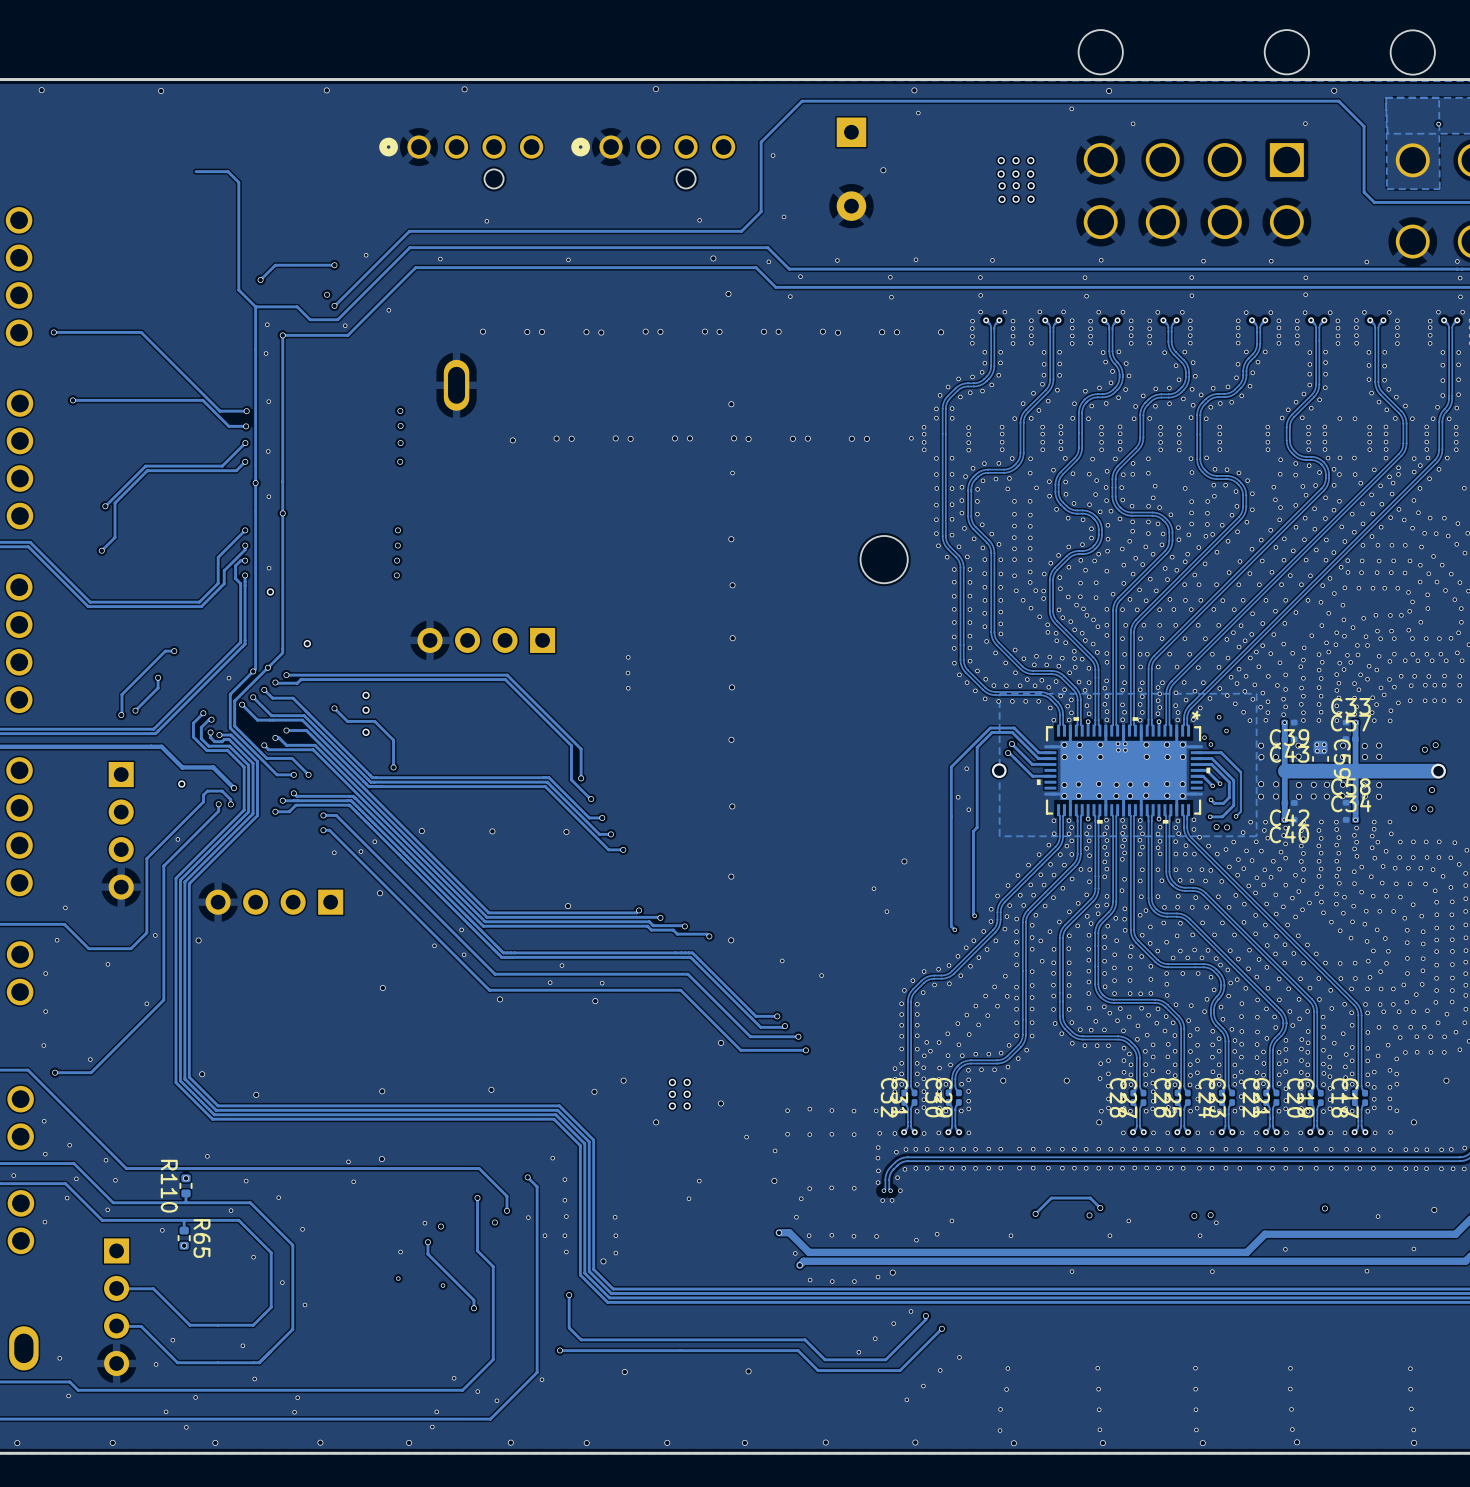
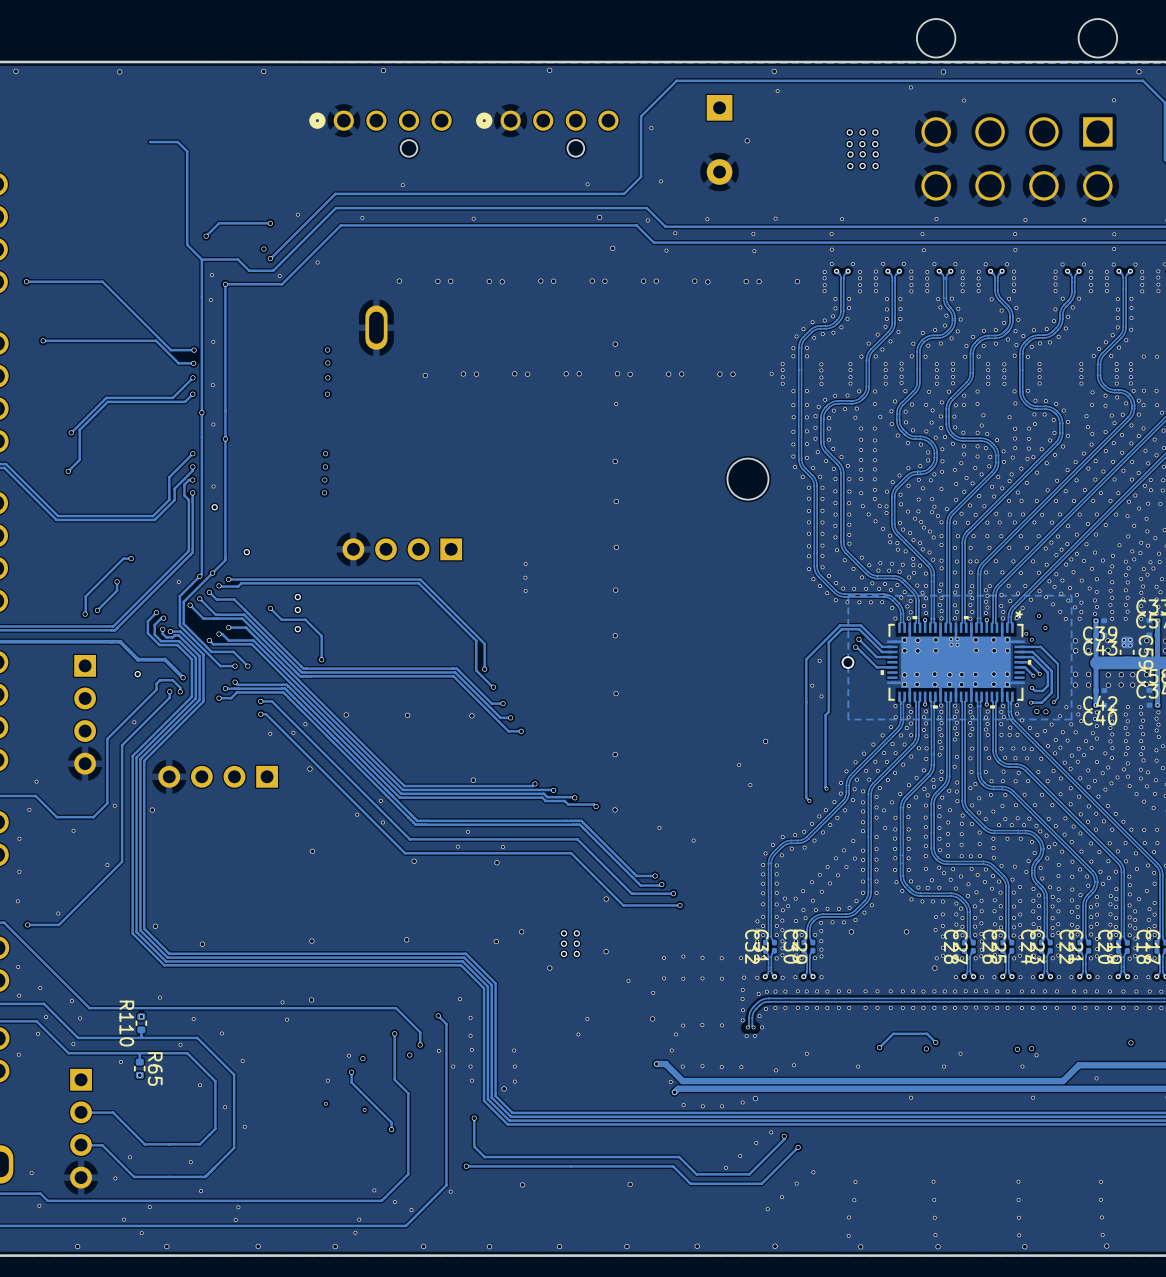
via: none -> (934, 506)
via: none -> (937, 516)

